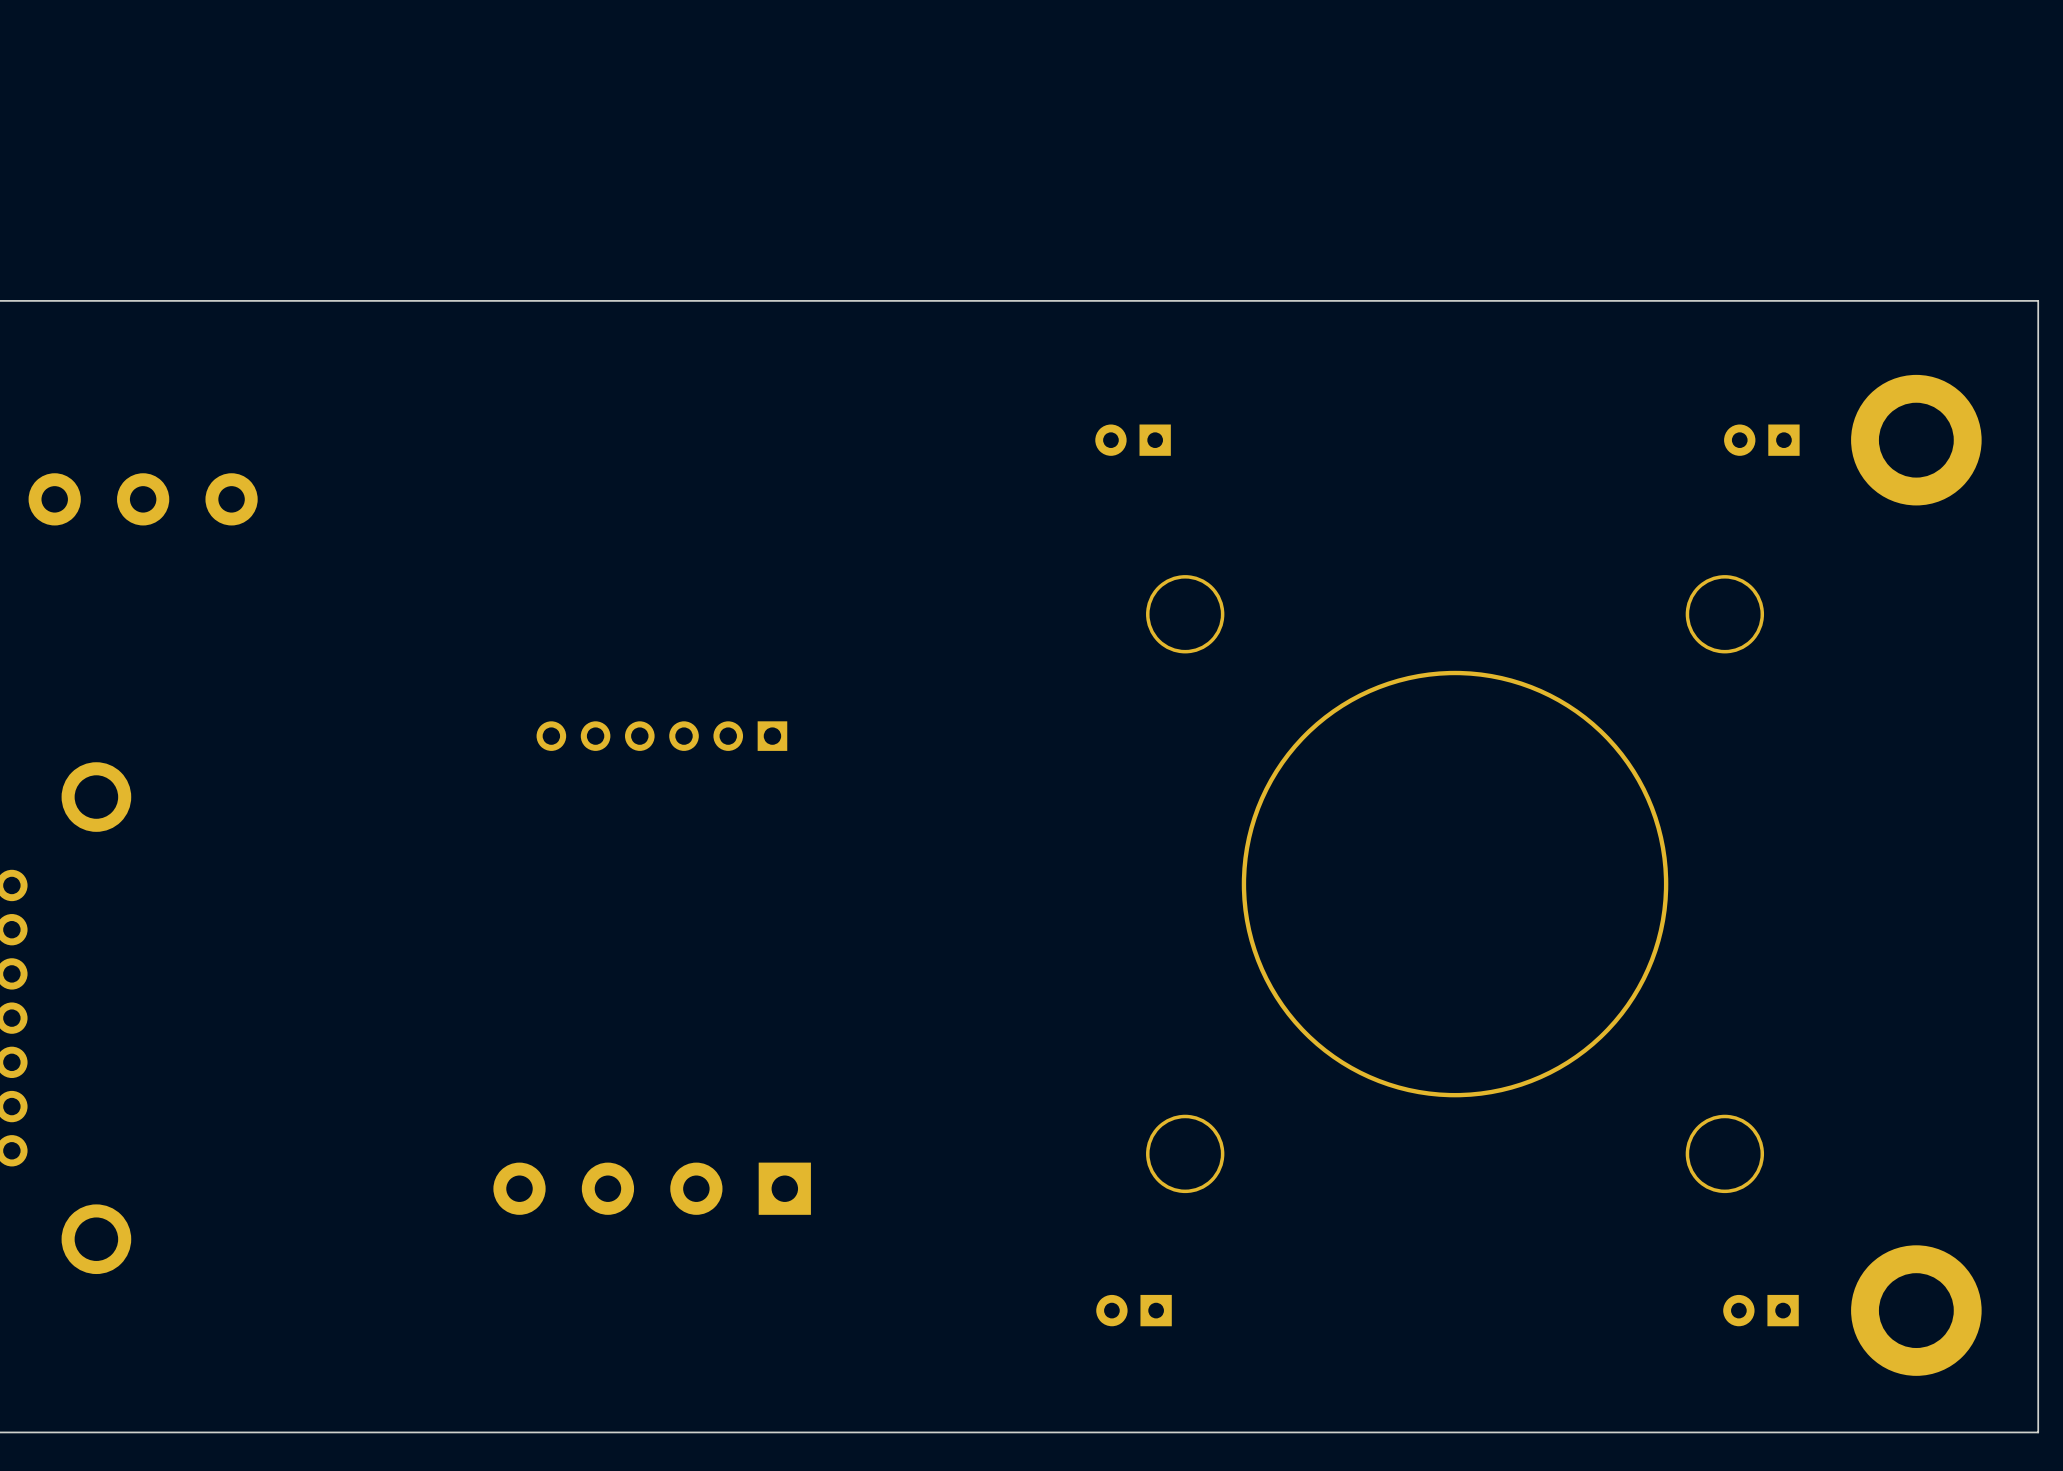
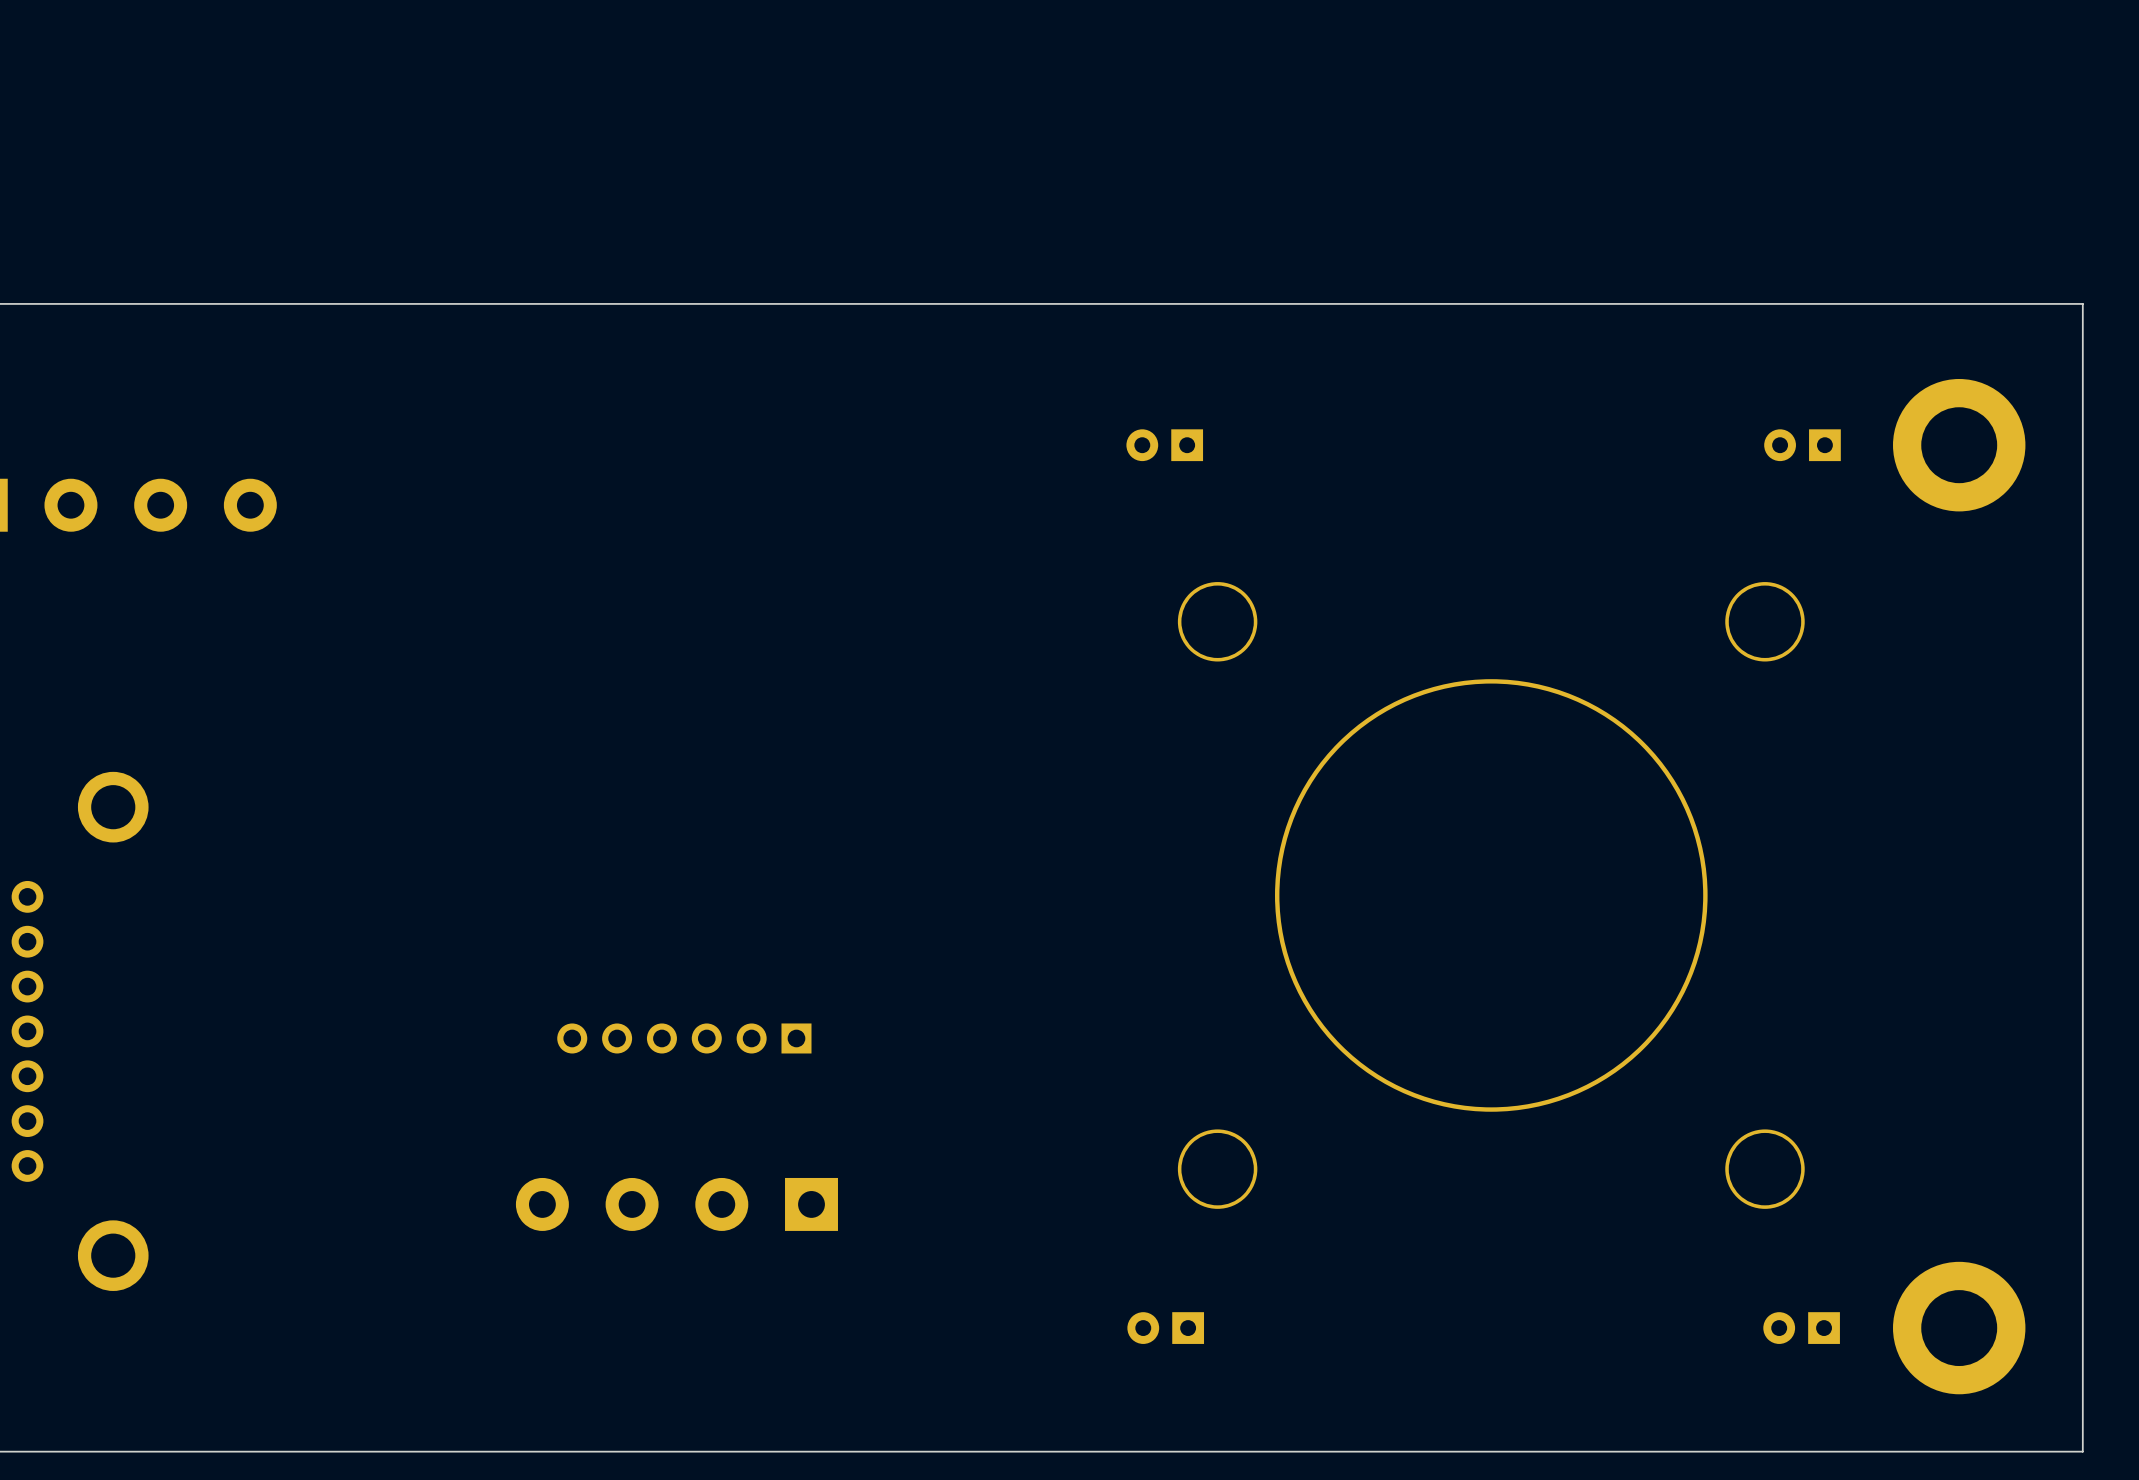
part position: (661, 736) -> (684, 1038)

